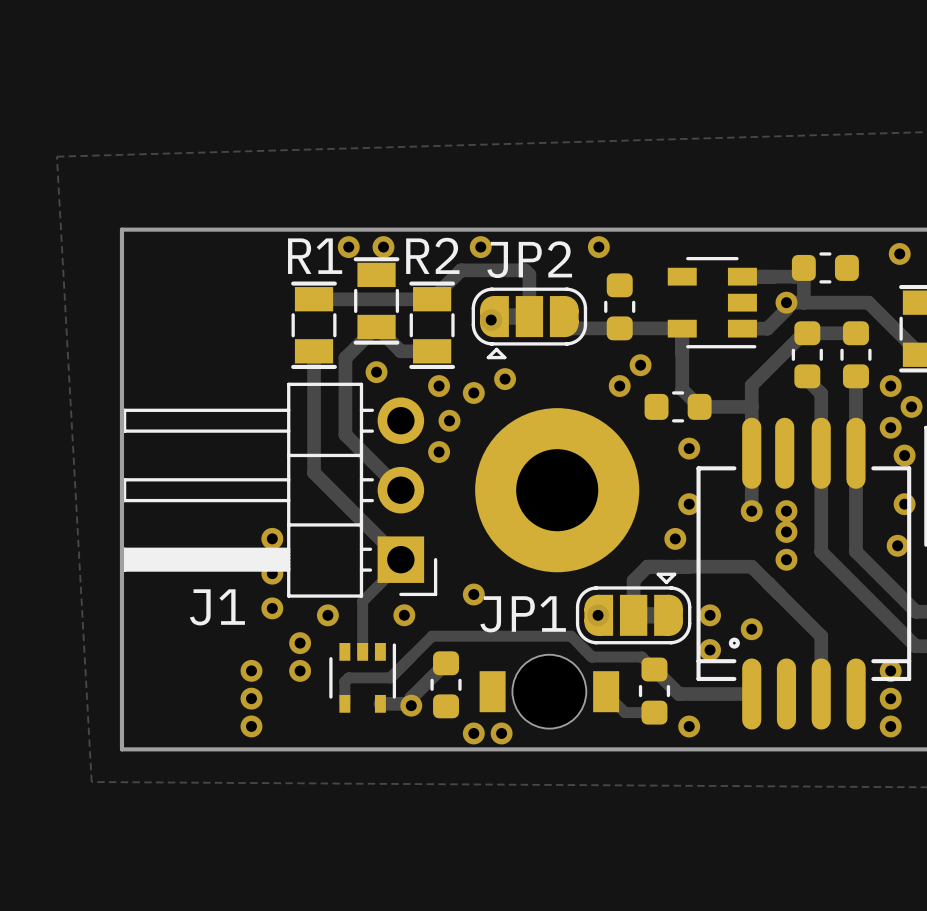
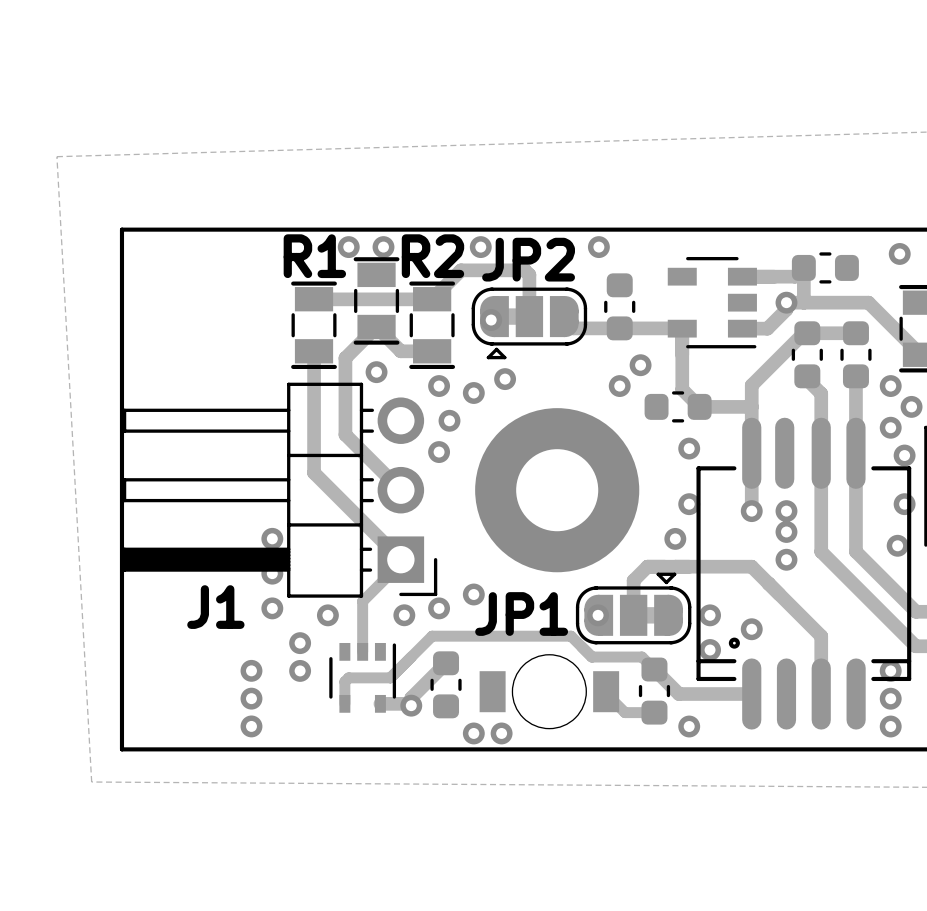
via: none -> (439, 608)

